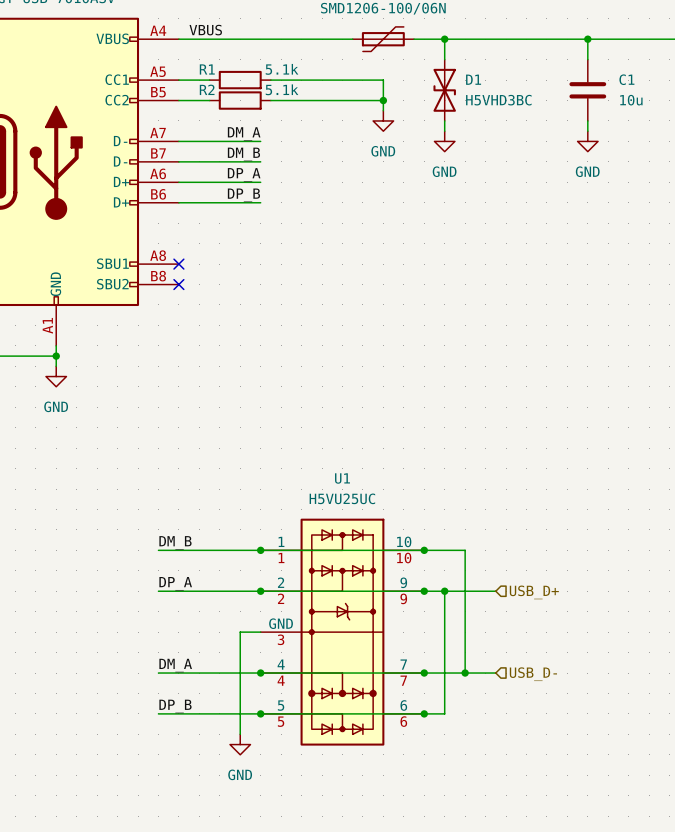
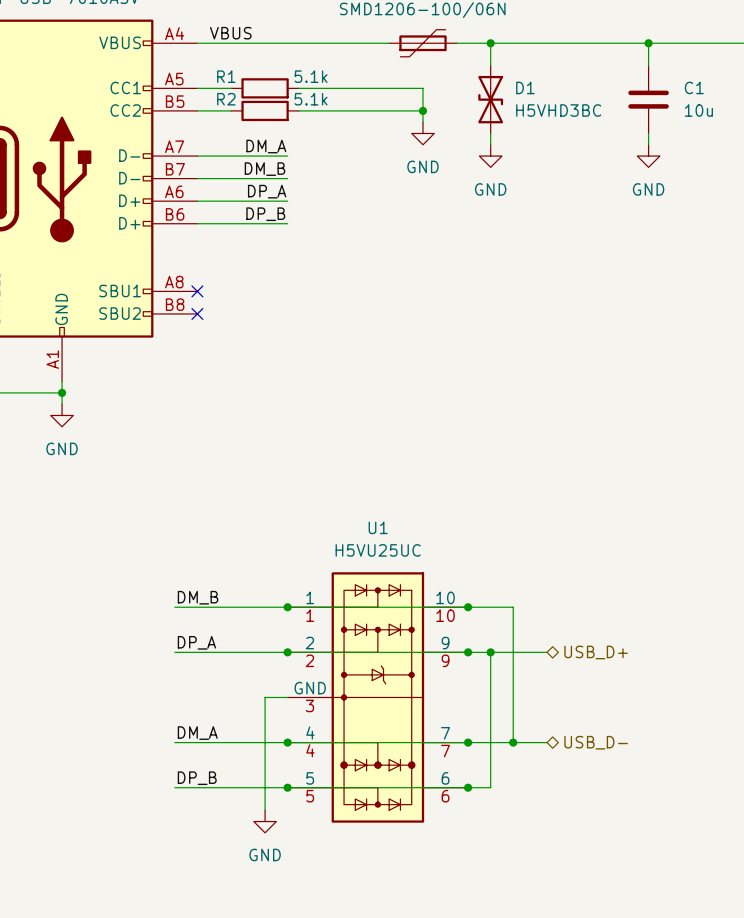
hierarchical label shape: input (534, 592) -> bidirectional (596, 652)
hierarchical label shape: input (533, 674) -> bidirectional (596, 742)

